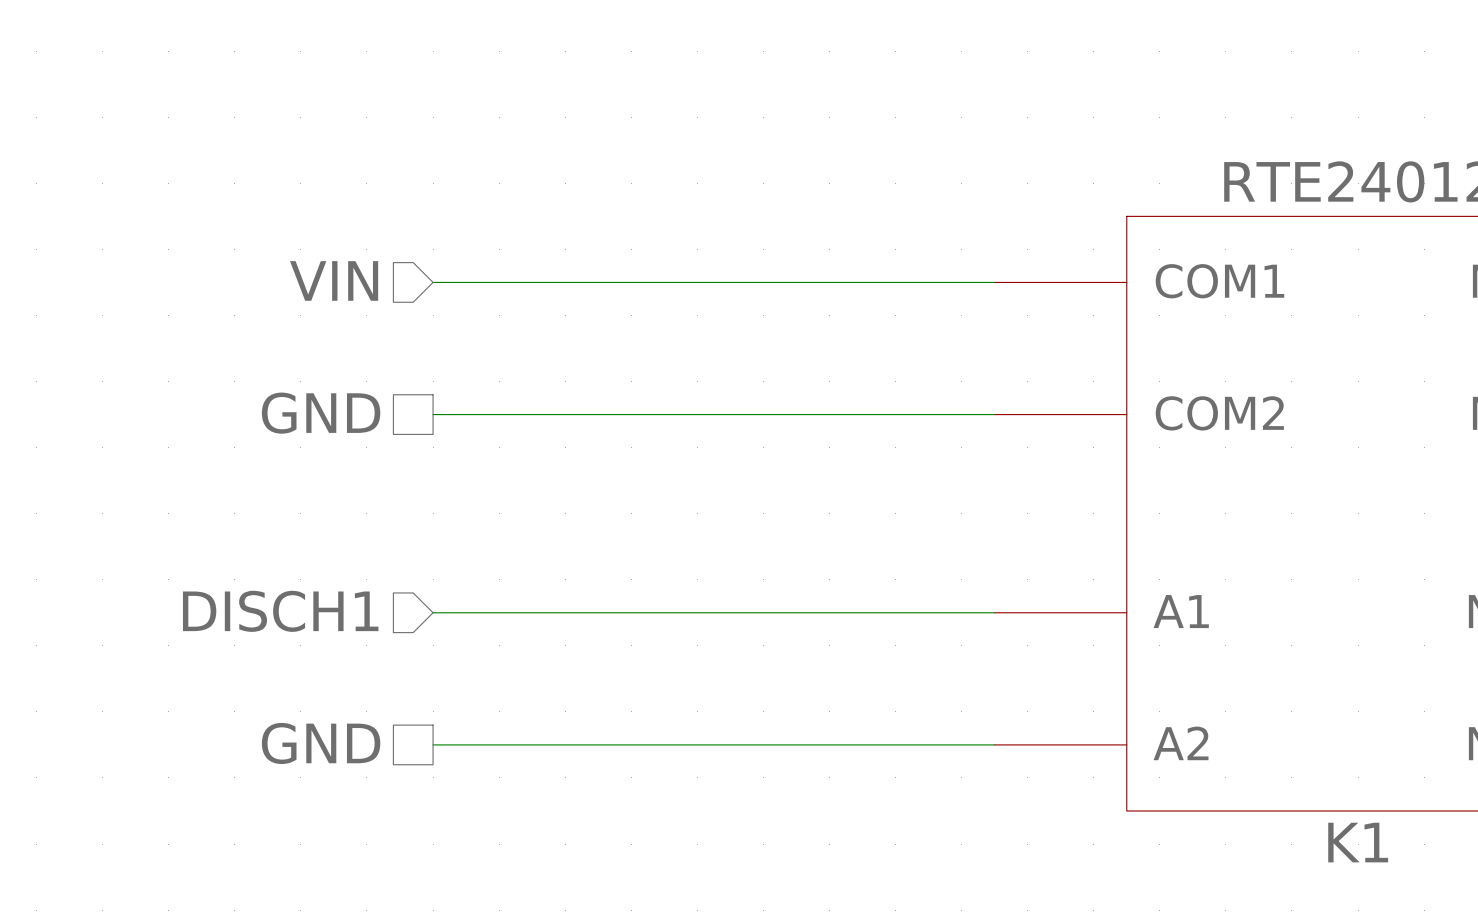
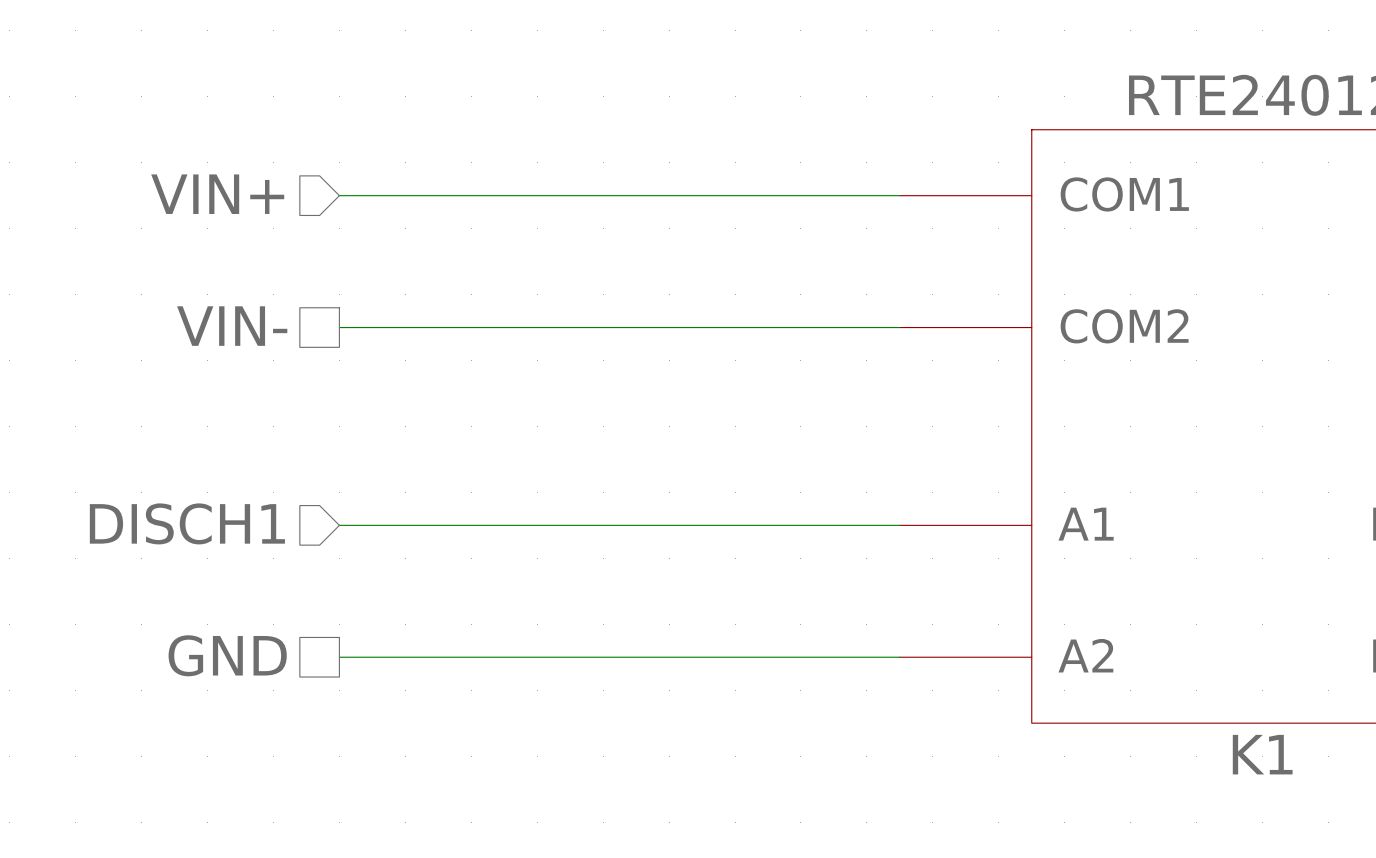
hierarchical label: VIN (334, 280) -> VIN+ (217, 194)
hierarchical label: GND (321, 413) -> VIN- (232, 326)

